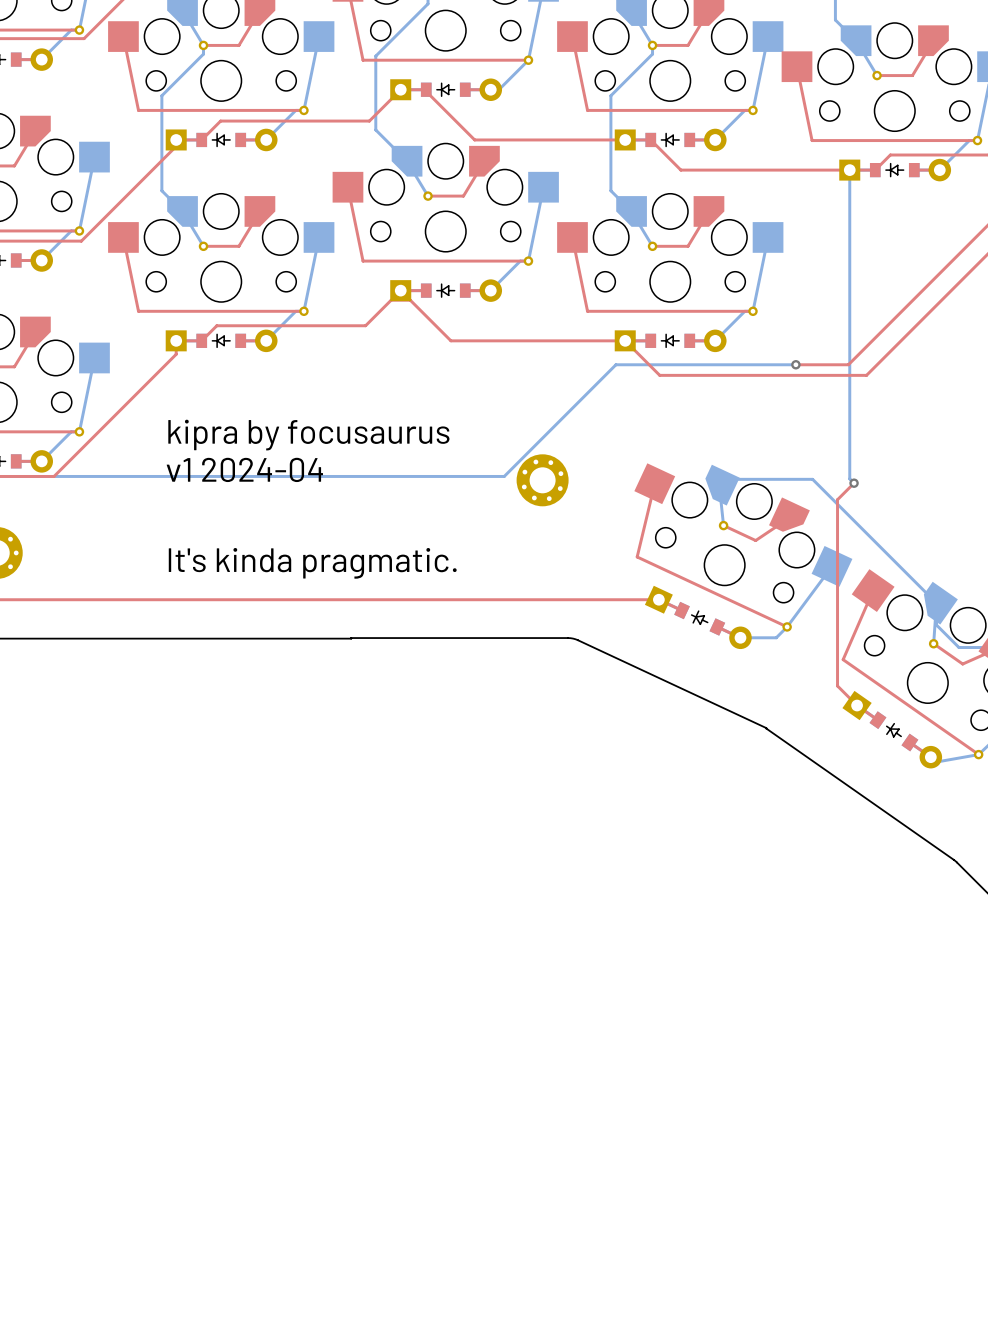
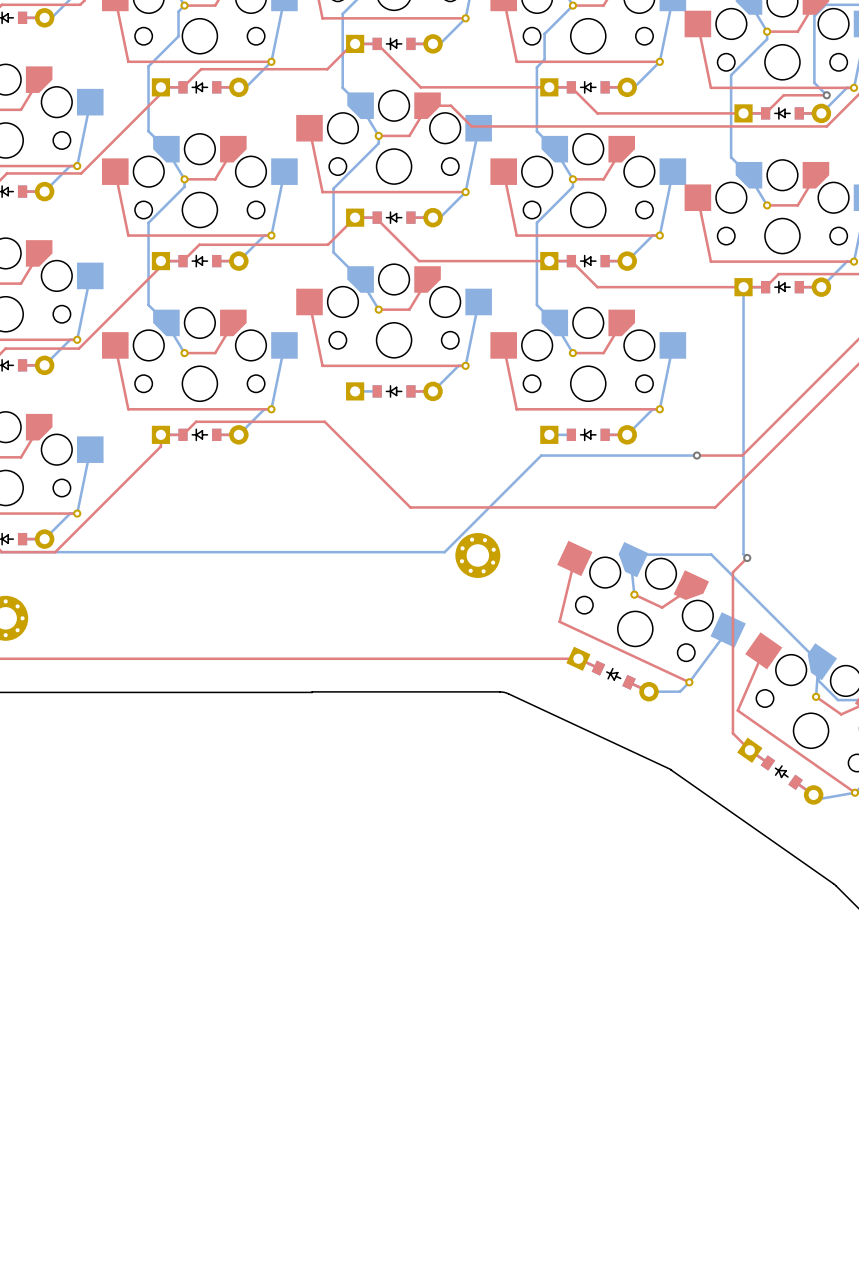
top track: (426, 290) (400, 290) (450, 340) (650, 340) -> none
top track: (410, 300) (391, 300) (365, 325) -> none
top track: (625, 340) (659, 375) (866, 375) -> (324, 421) (410, 507) (715, 507) (758, 464)
text: kipra by focusaurus (308, 435) -> none
text: v1 2024-04 (244, 469) -> none
text: It's kinda pragmatic. (312, 563) -> none

